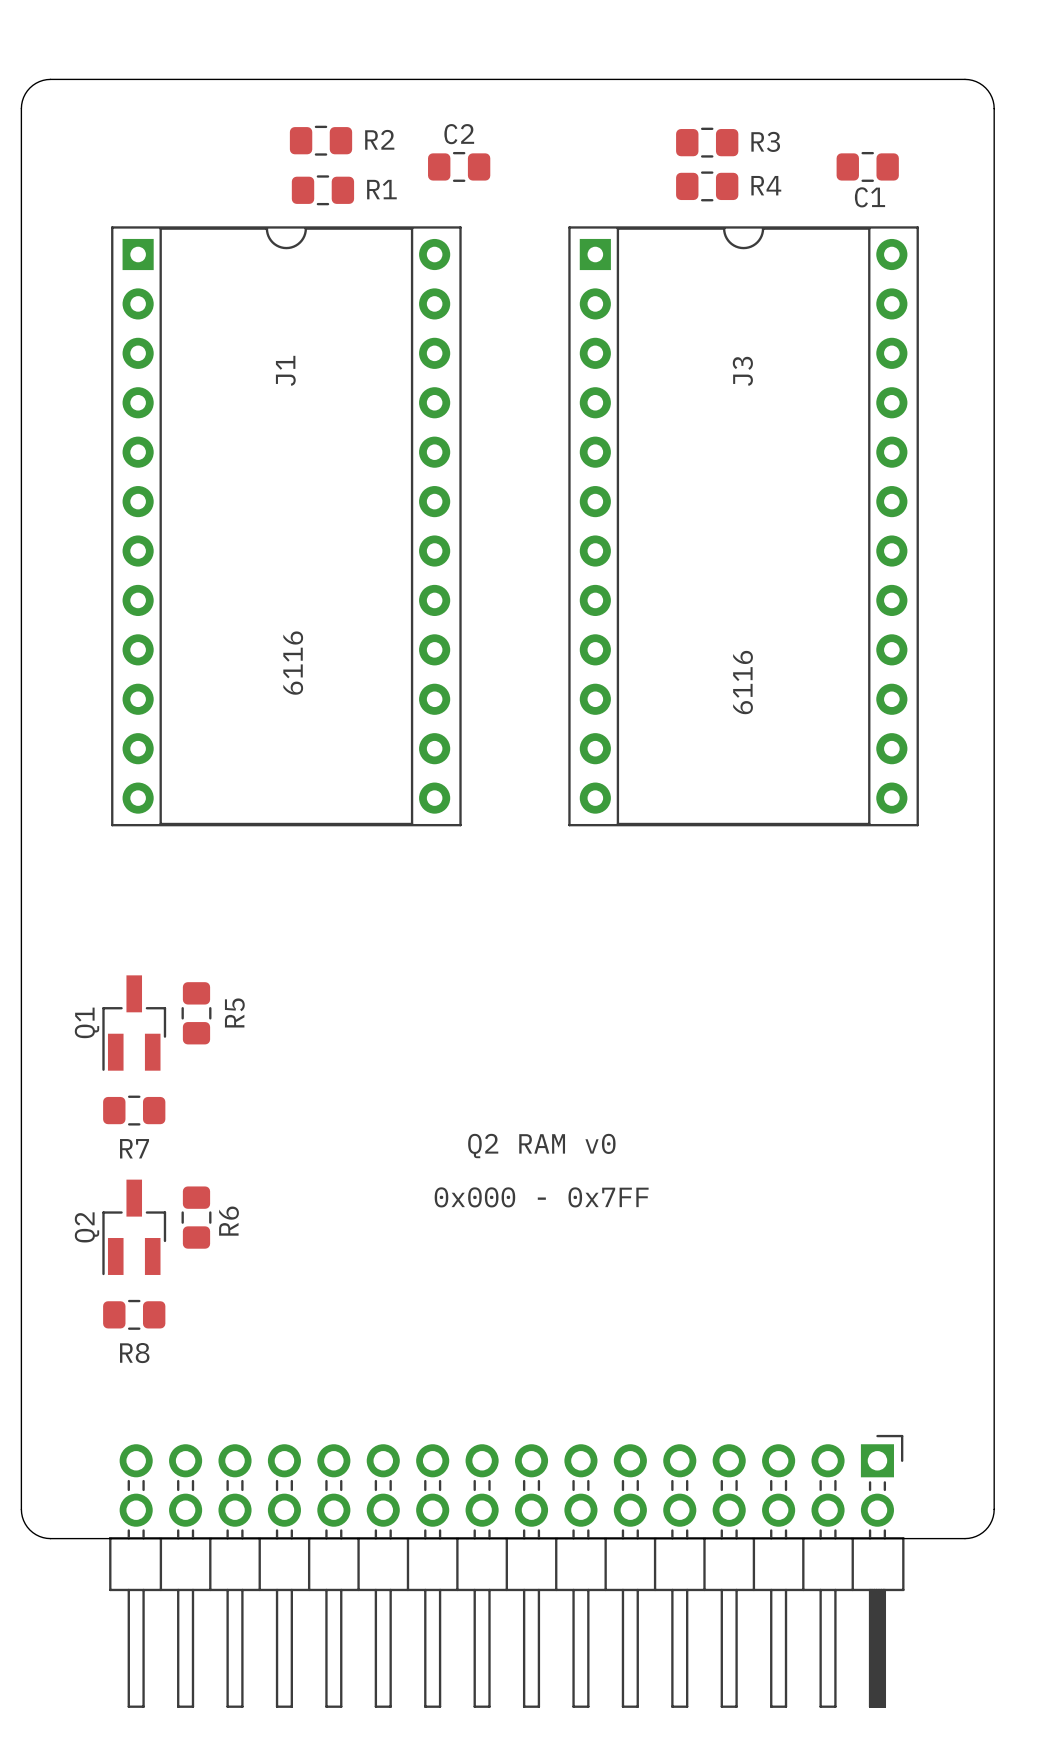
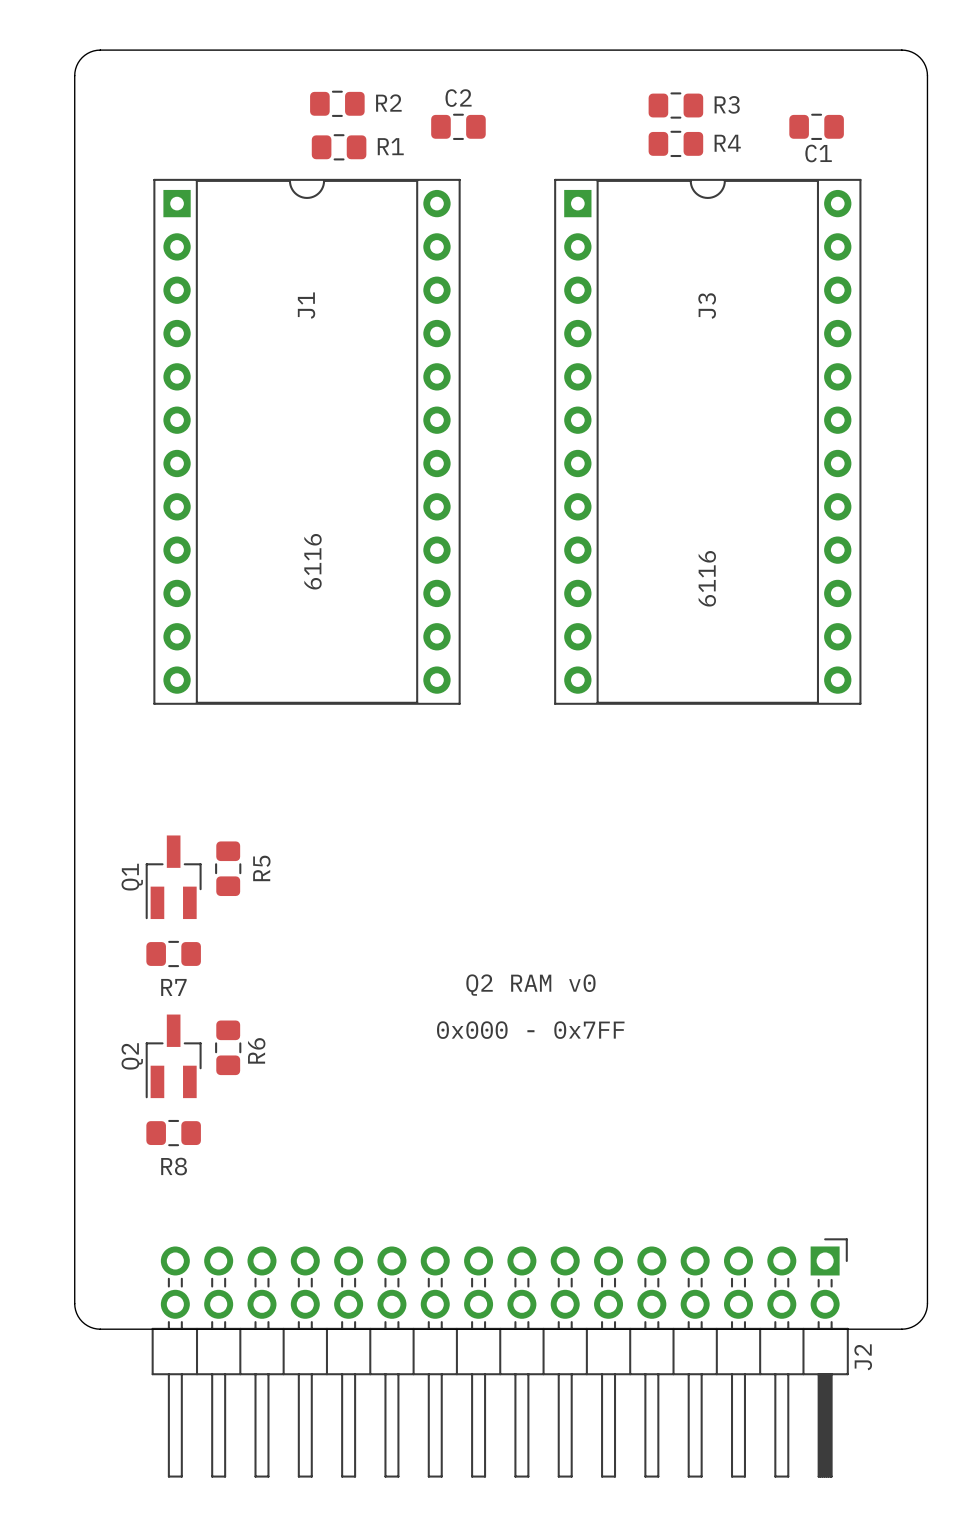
J2 name: none -> J2 (863, 1357)

